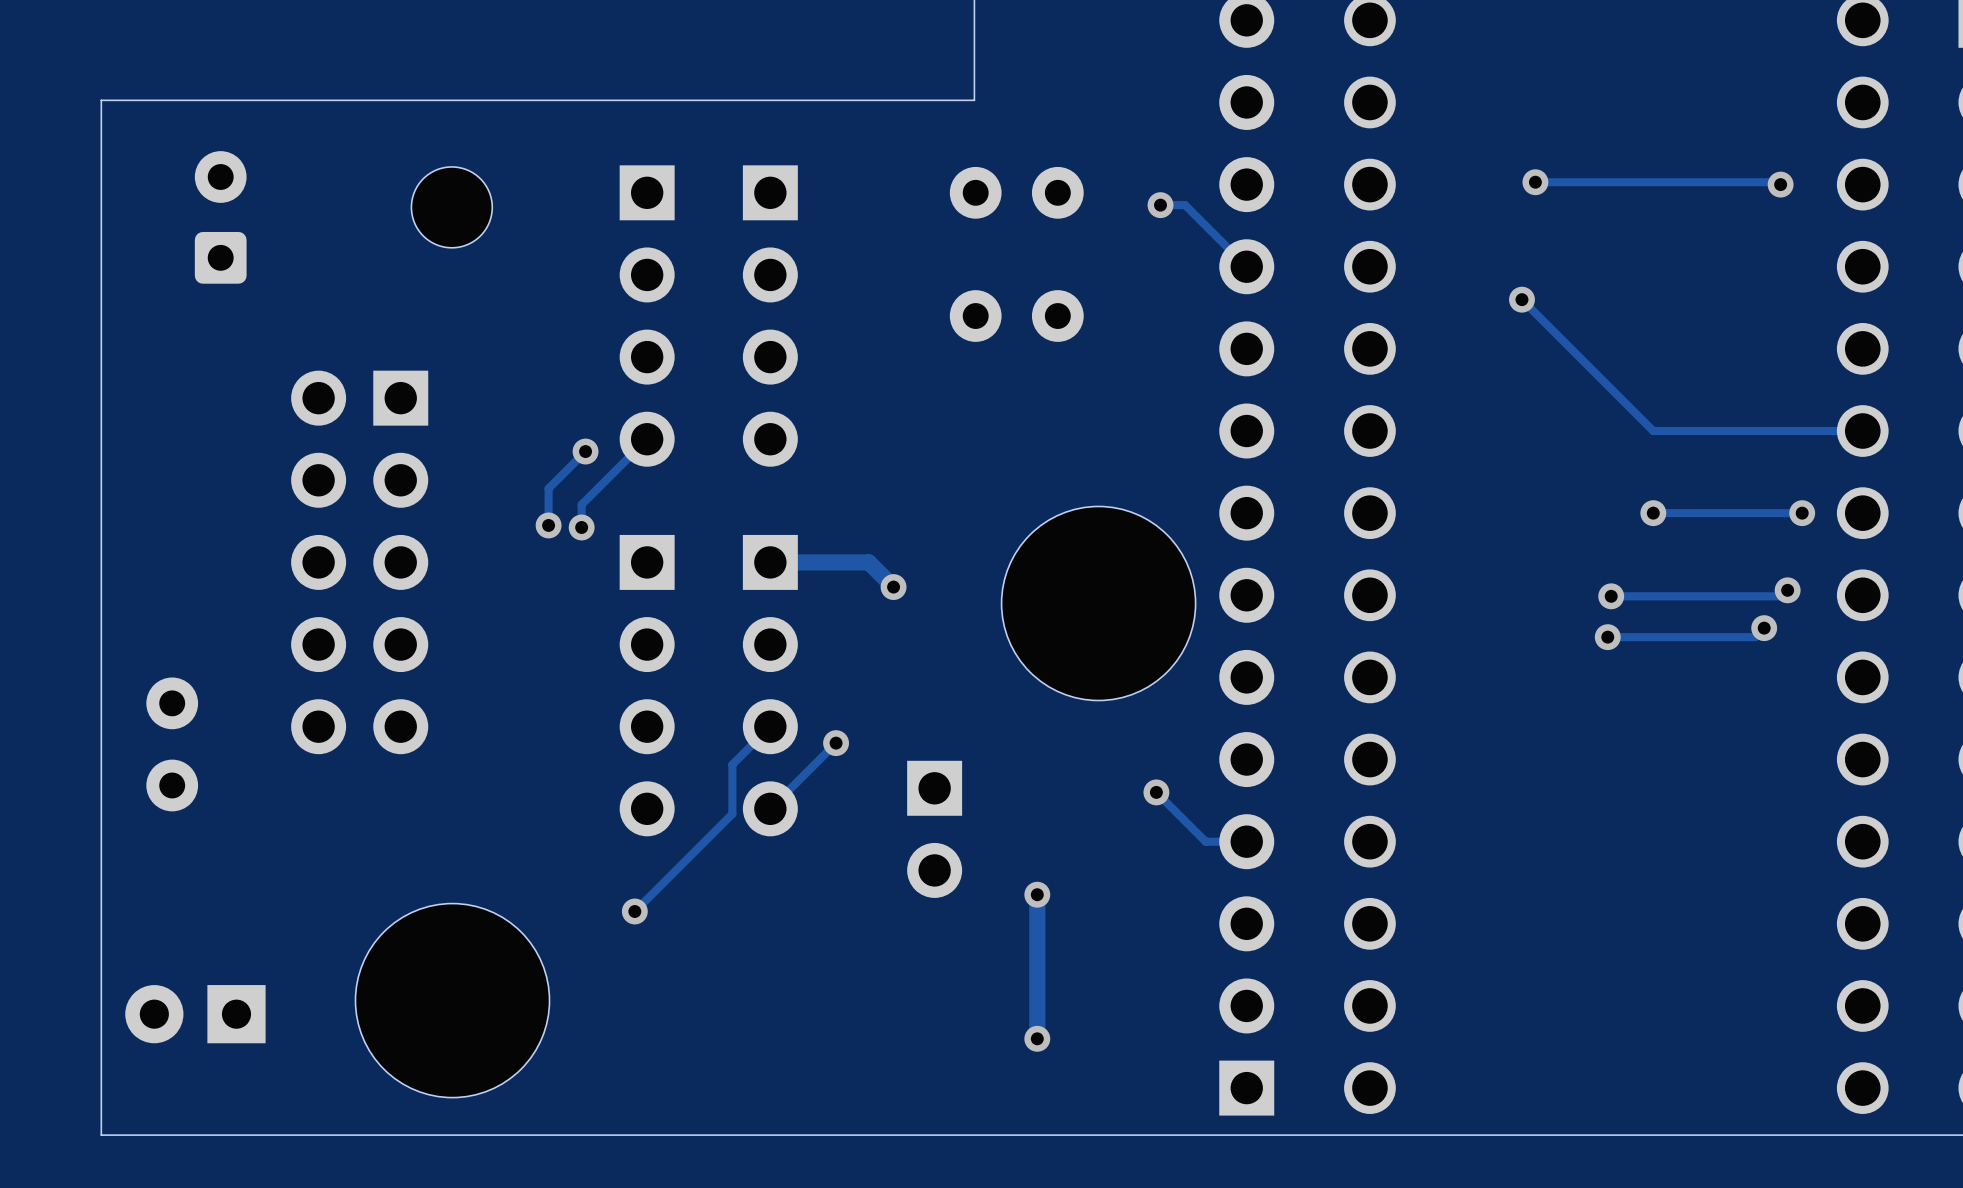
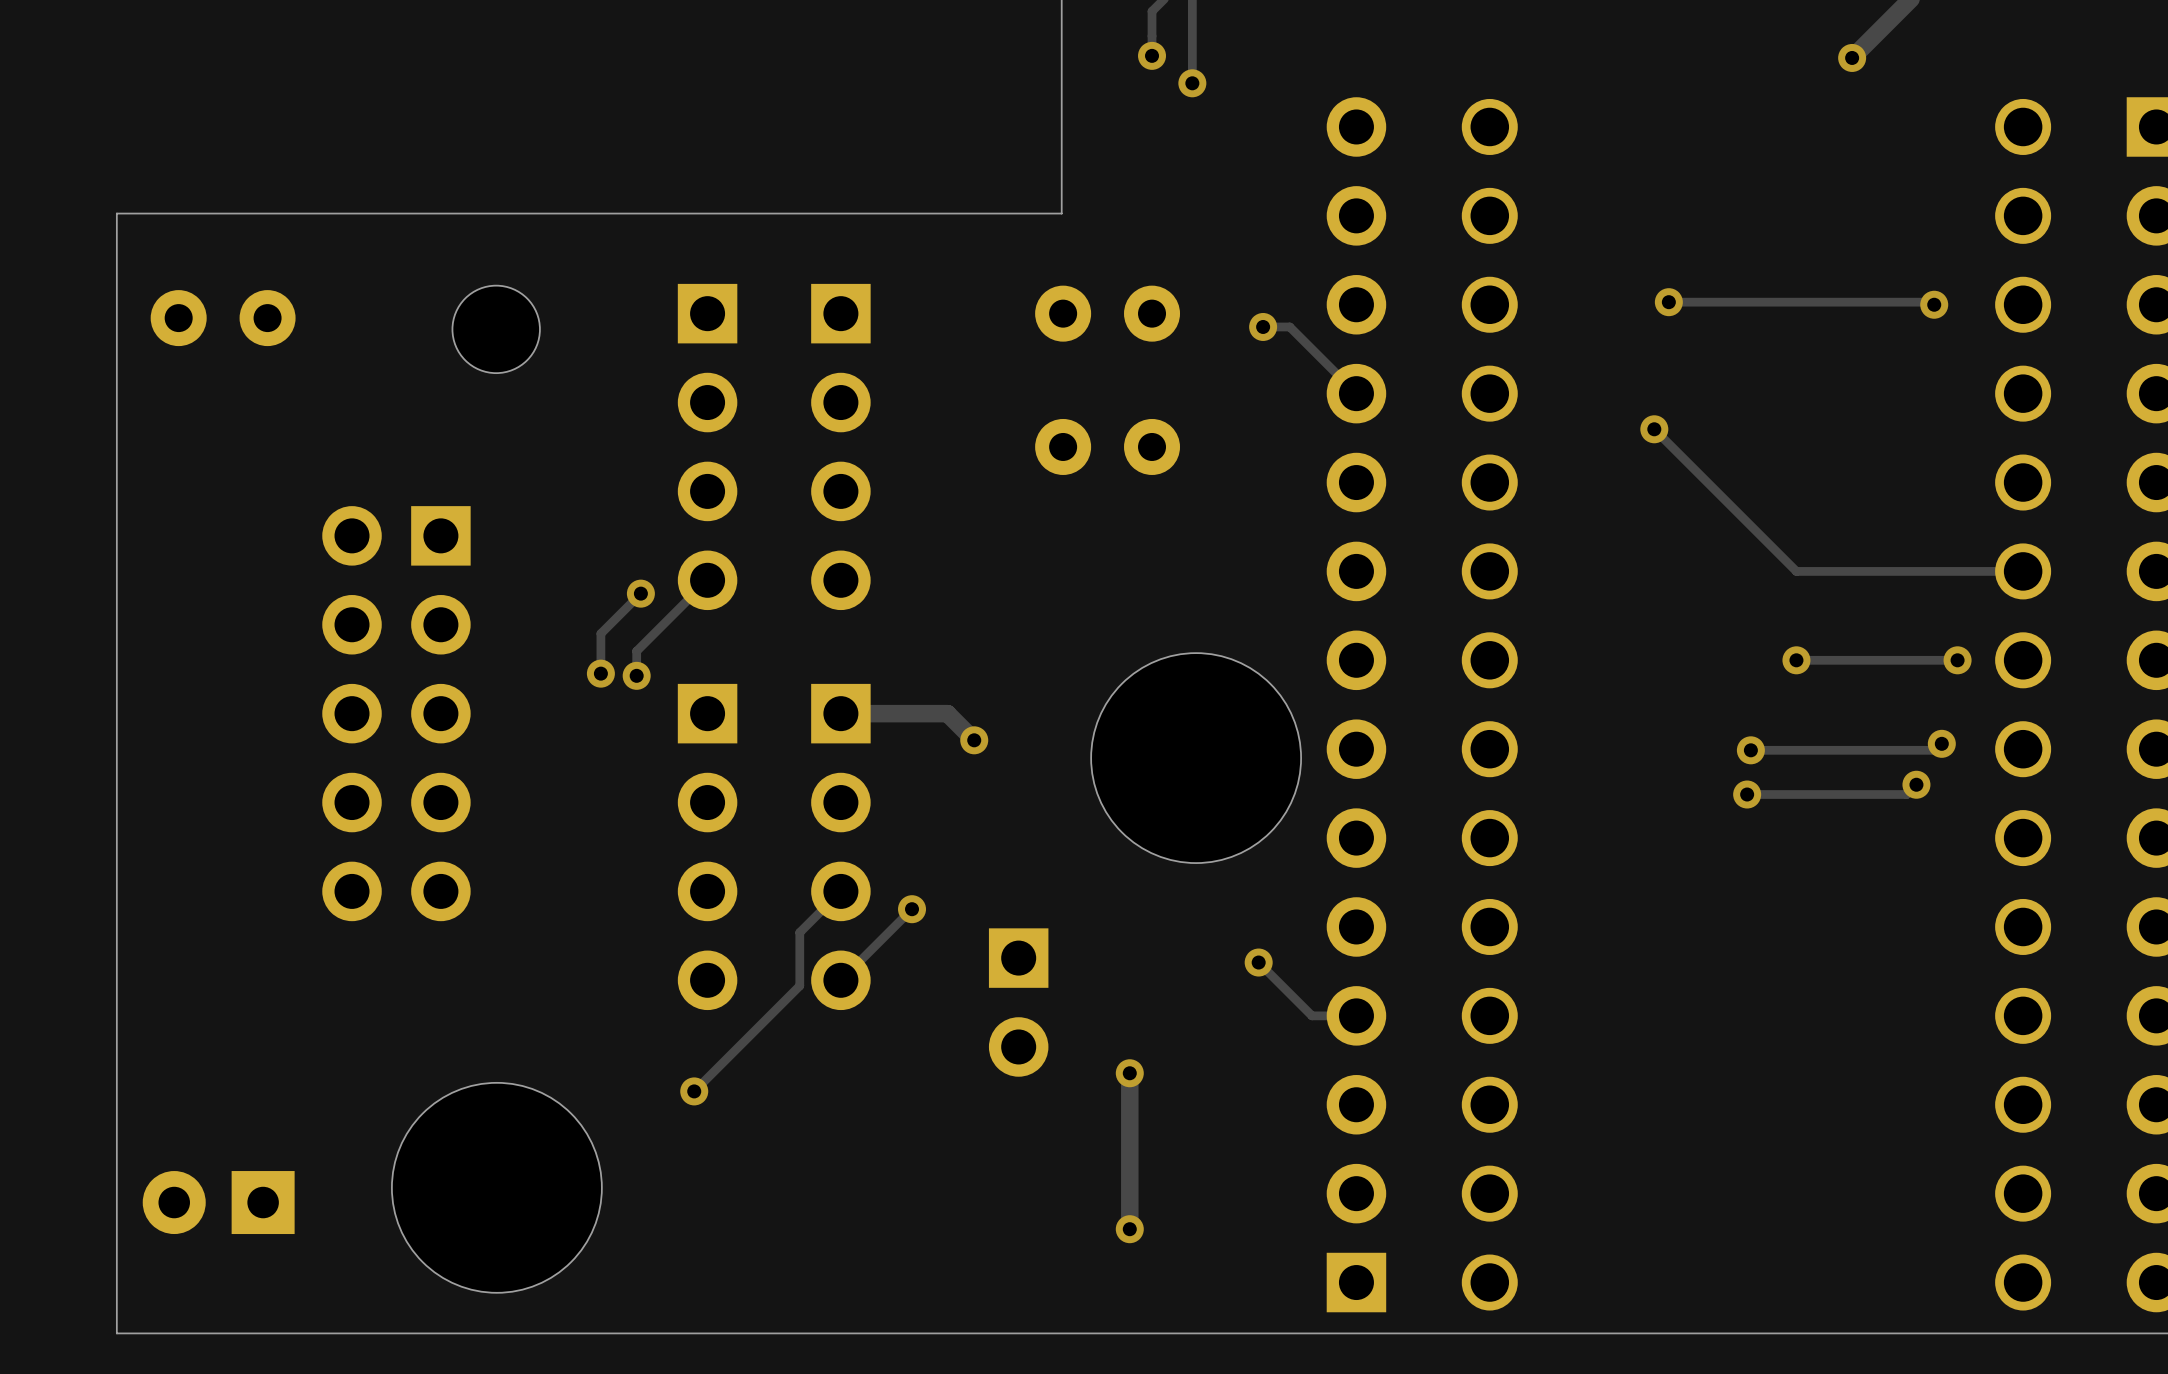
part footprint: [194, 151, 247, 284] -> [150, 290, 296, 347]
part: (172, 744) -> none

